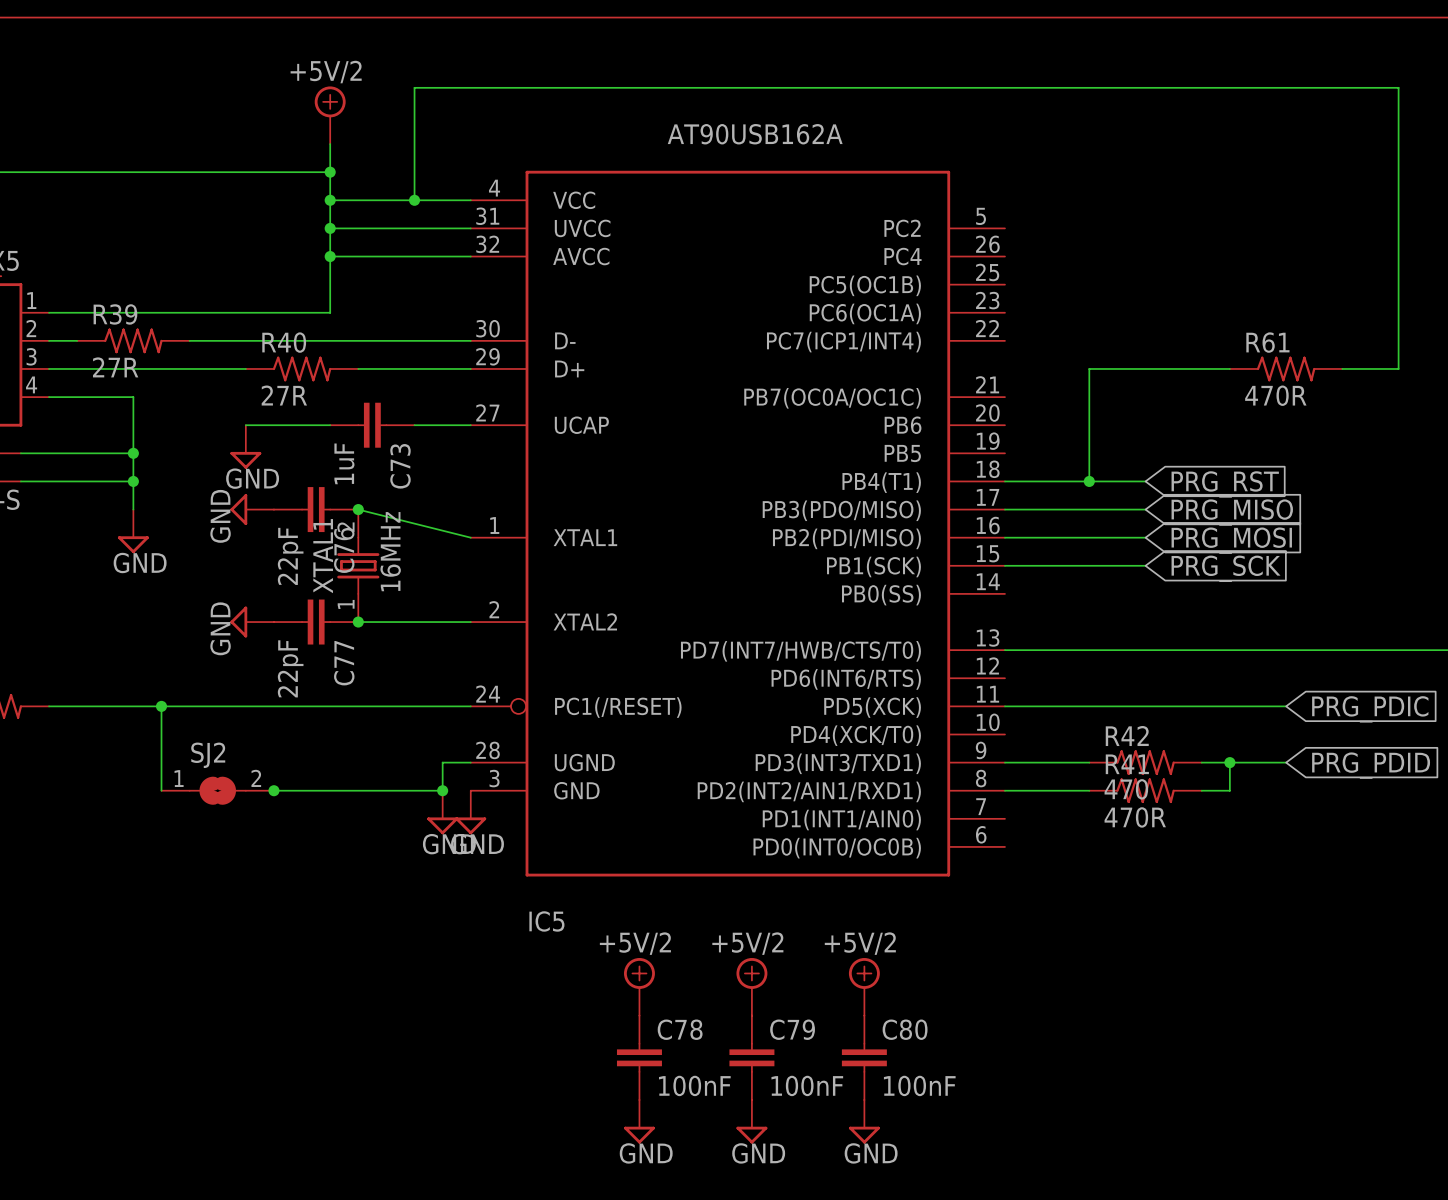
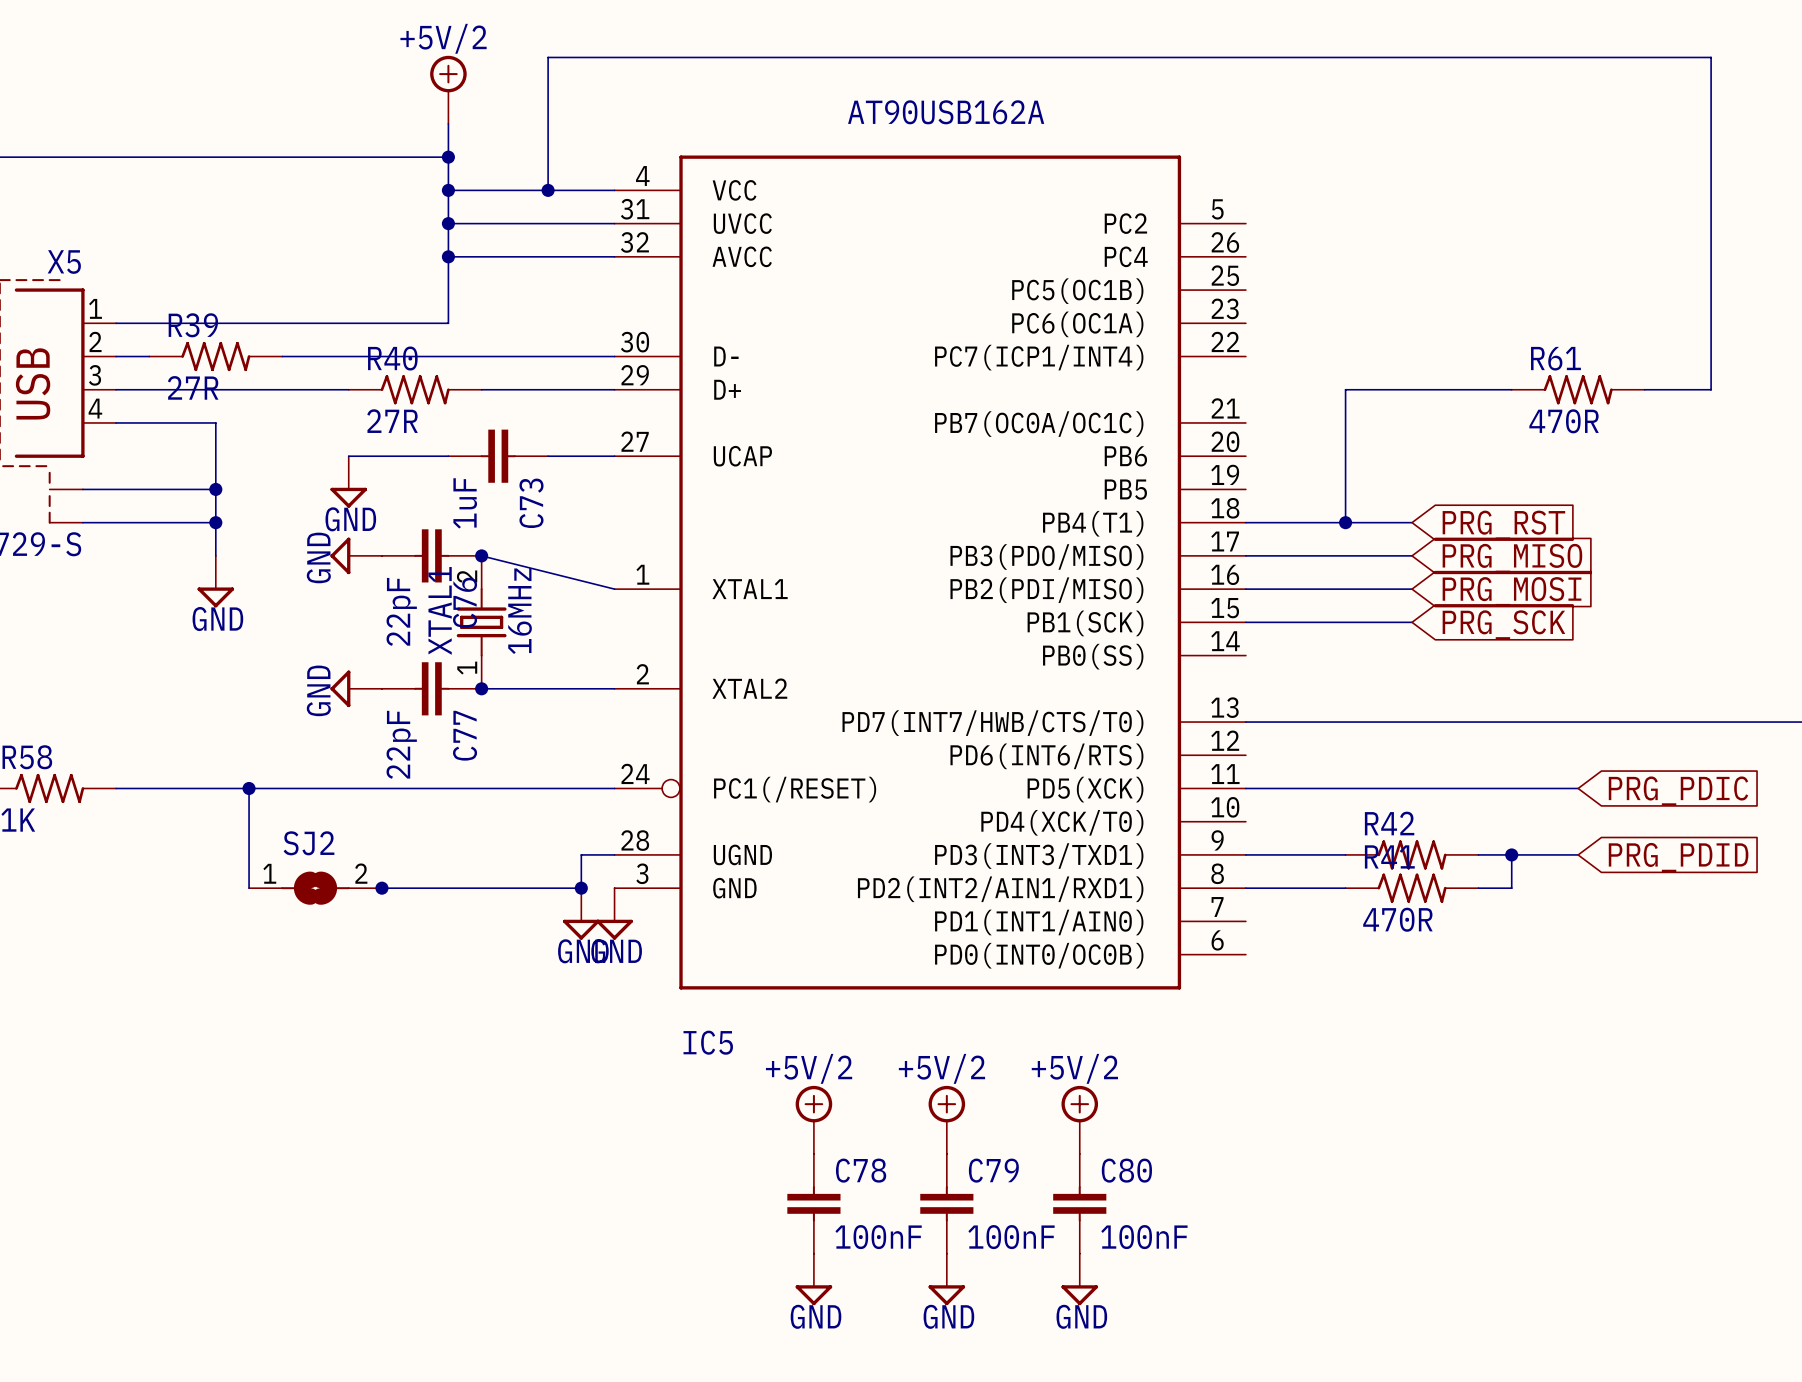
R42 value: 470 (1126, 789) -> none

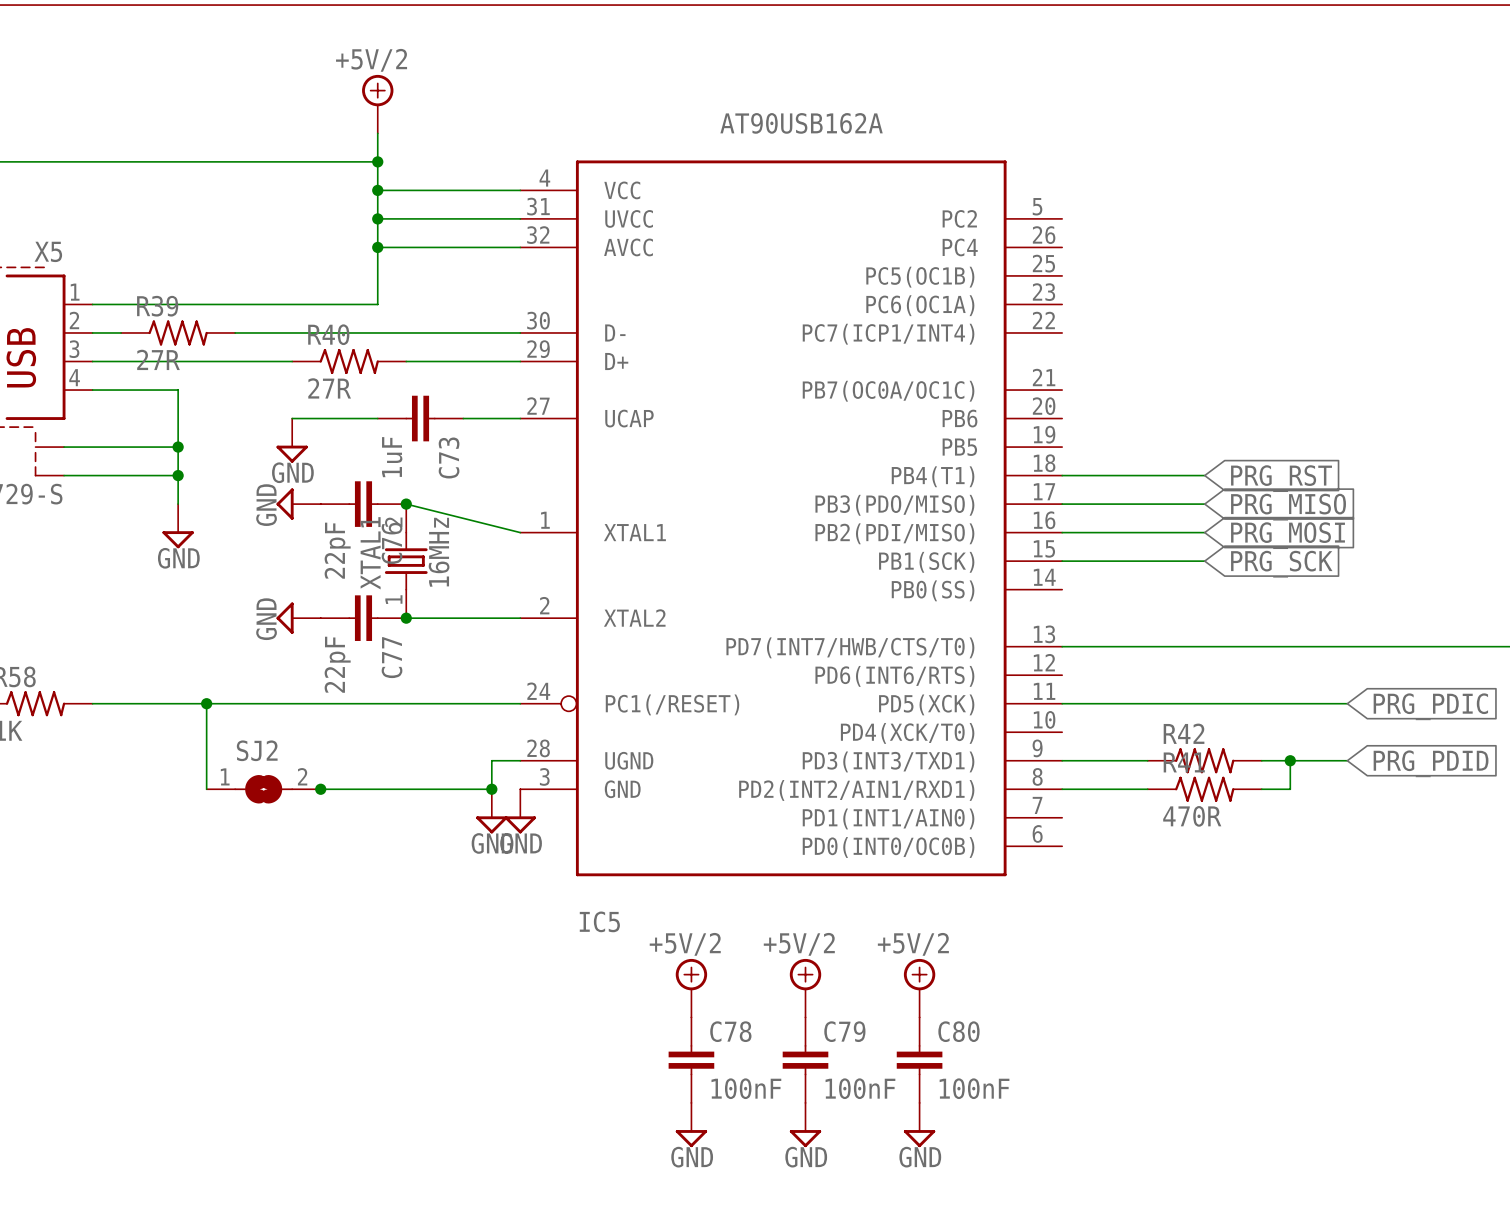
wire: (548, 190) (548, 57) (1711, 57) (1711, 389) (1644, 389) -> none
junction: (548, 190) -> none
wire: (1511, 389) (1345, 389) (1345, 522) -> none
R61: 470R (1578, 389) -> none
junction: (1345, 522) -> none

